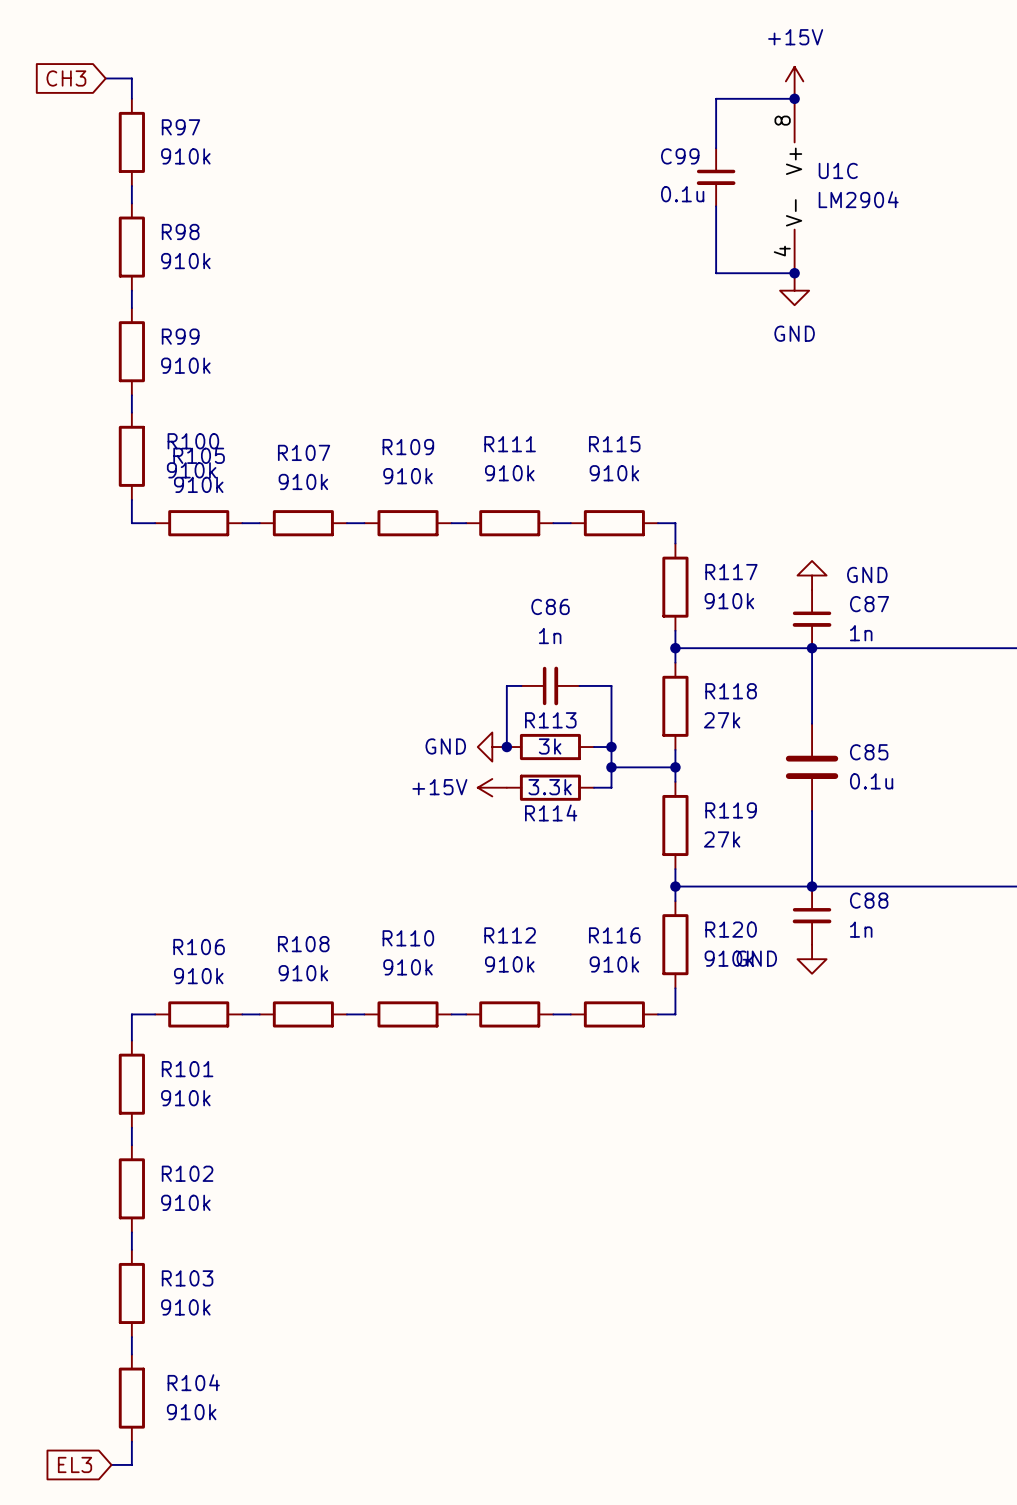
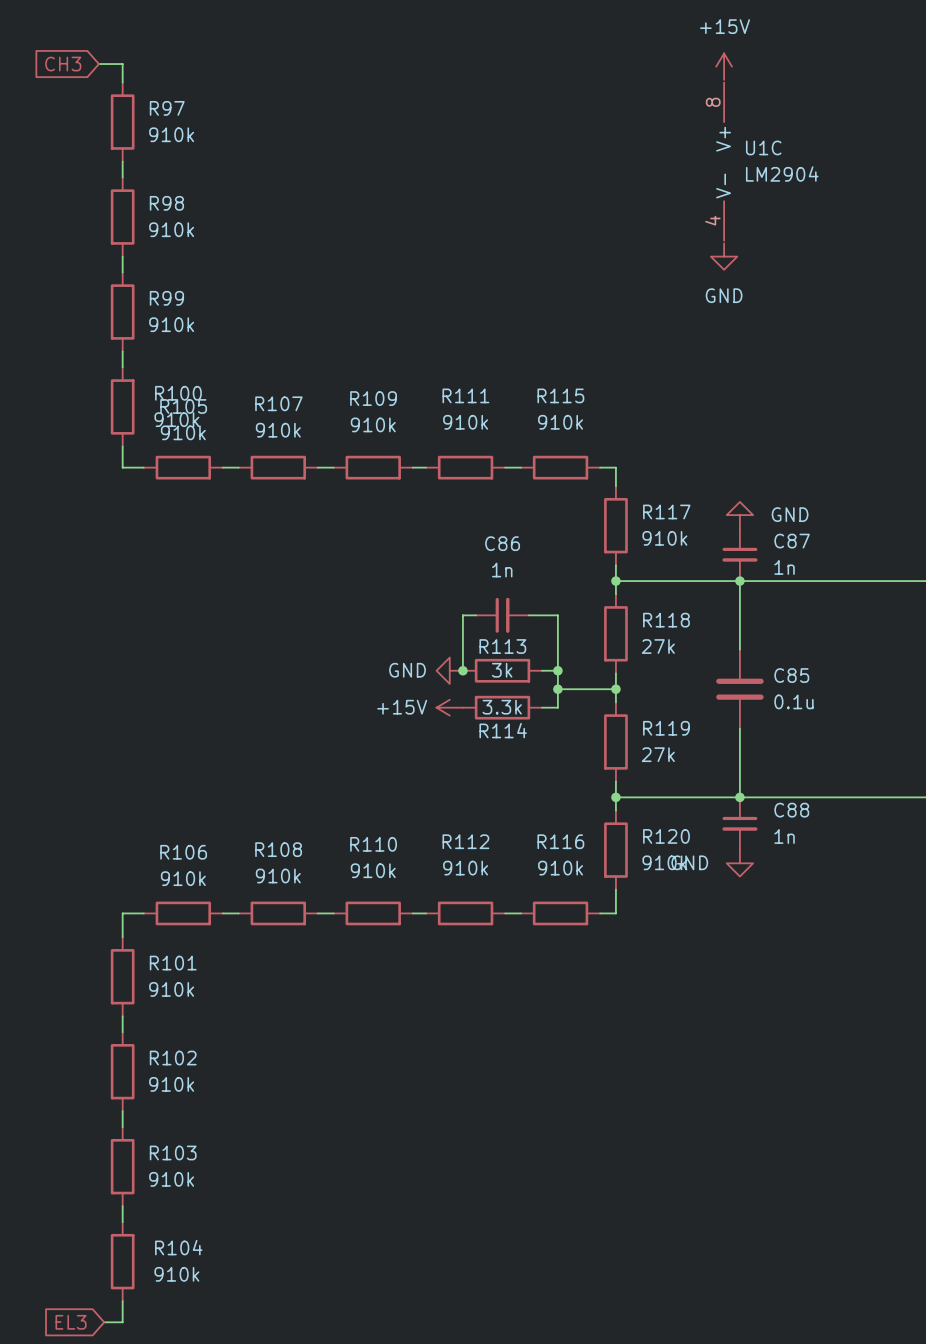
wire: (794, 95) (794, 98) (716, 98) (716, 148) -> none
junction: (794, 98) -> none
C99: 0.1u (716, 177) -> none
wire: (716, 206) (716, 273) (794, 273) (794, 276) -> none
junction: (794, 273) -> none

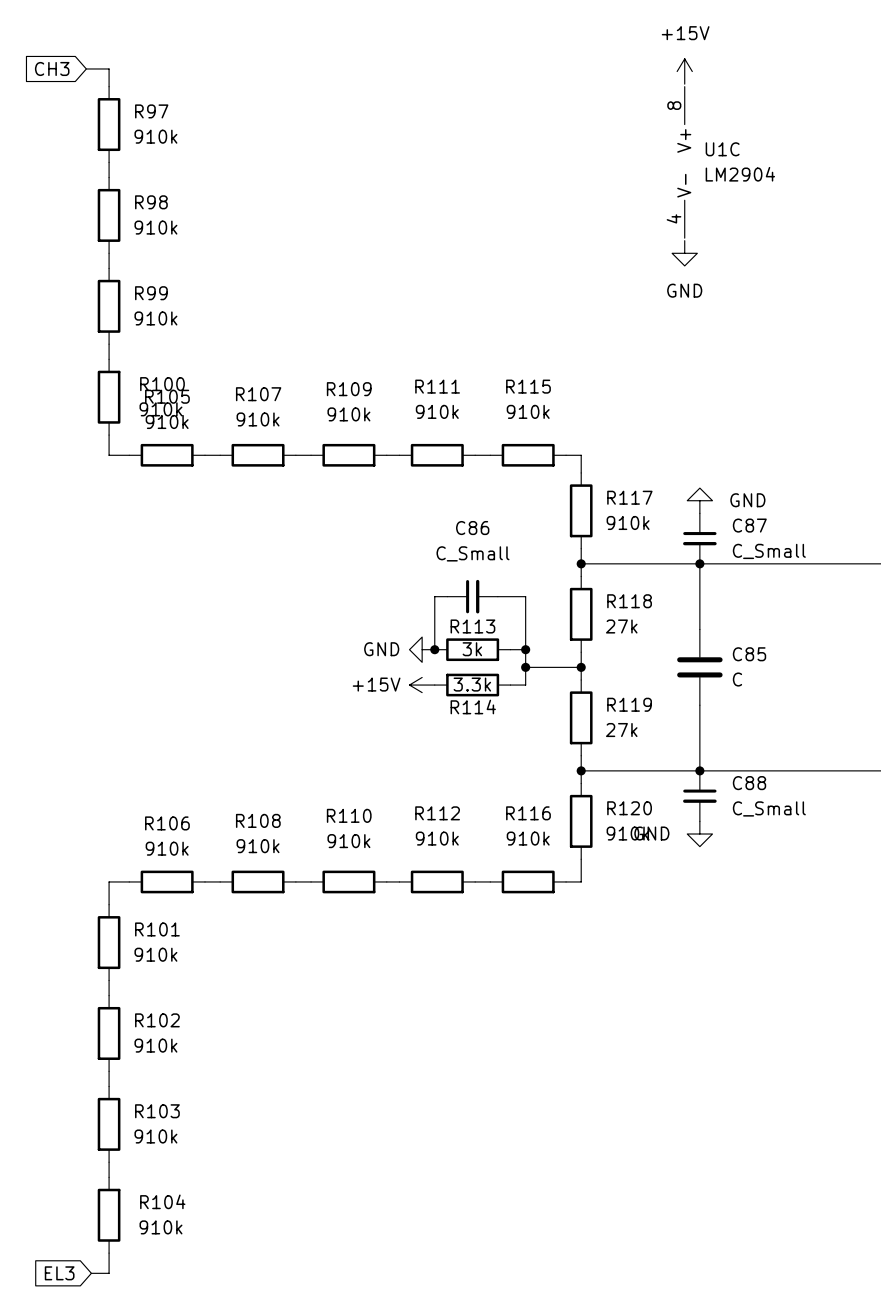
C87 value: 1n (784, 567) -> C_Small (769, 551)
C86 value: 1n (502, 570) -> C_Small (473, 553)
C85 value: 0.1u (793, 701) -> C (737, 679)
C88 value: 1n (784, 836) -> C_Small (769, 808)

